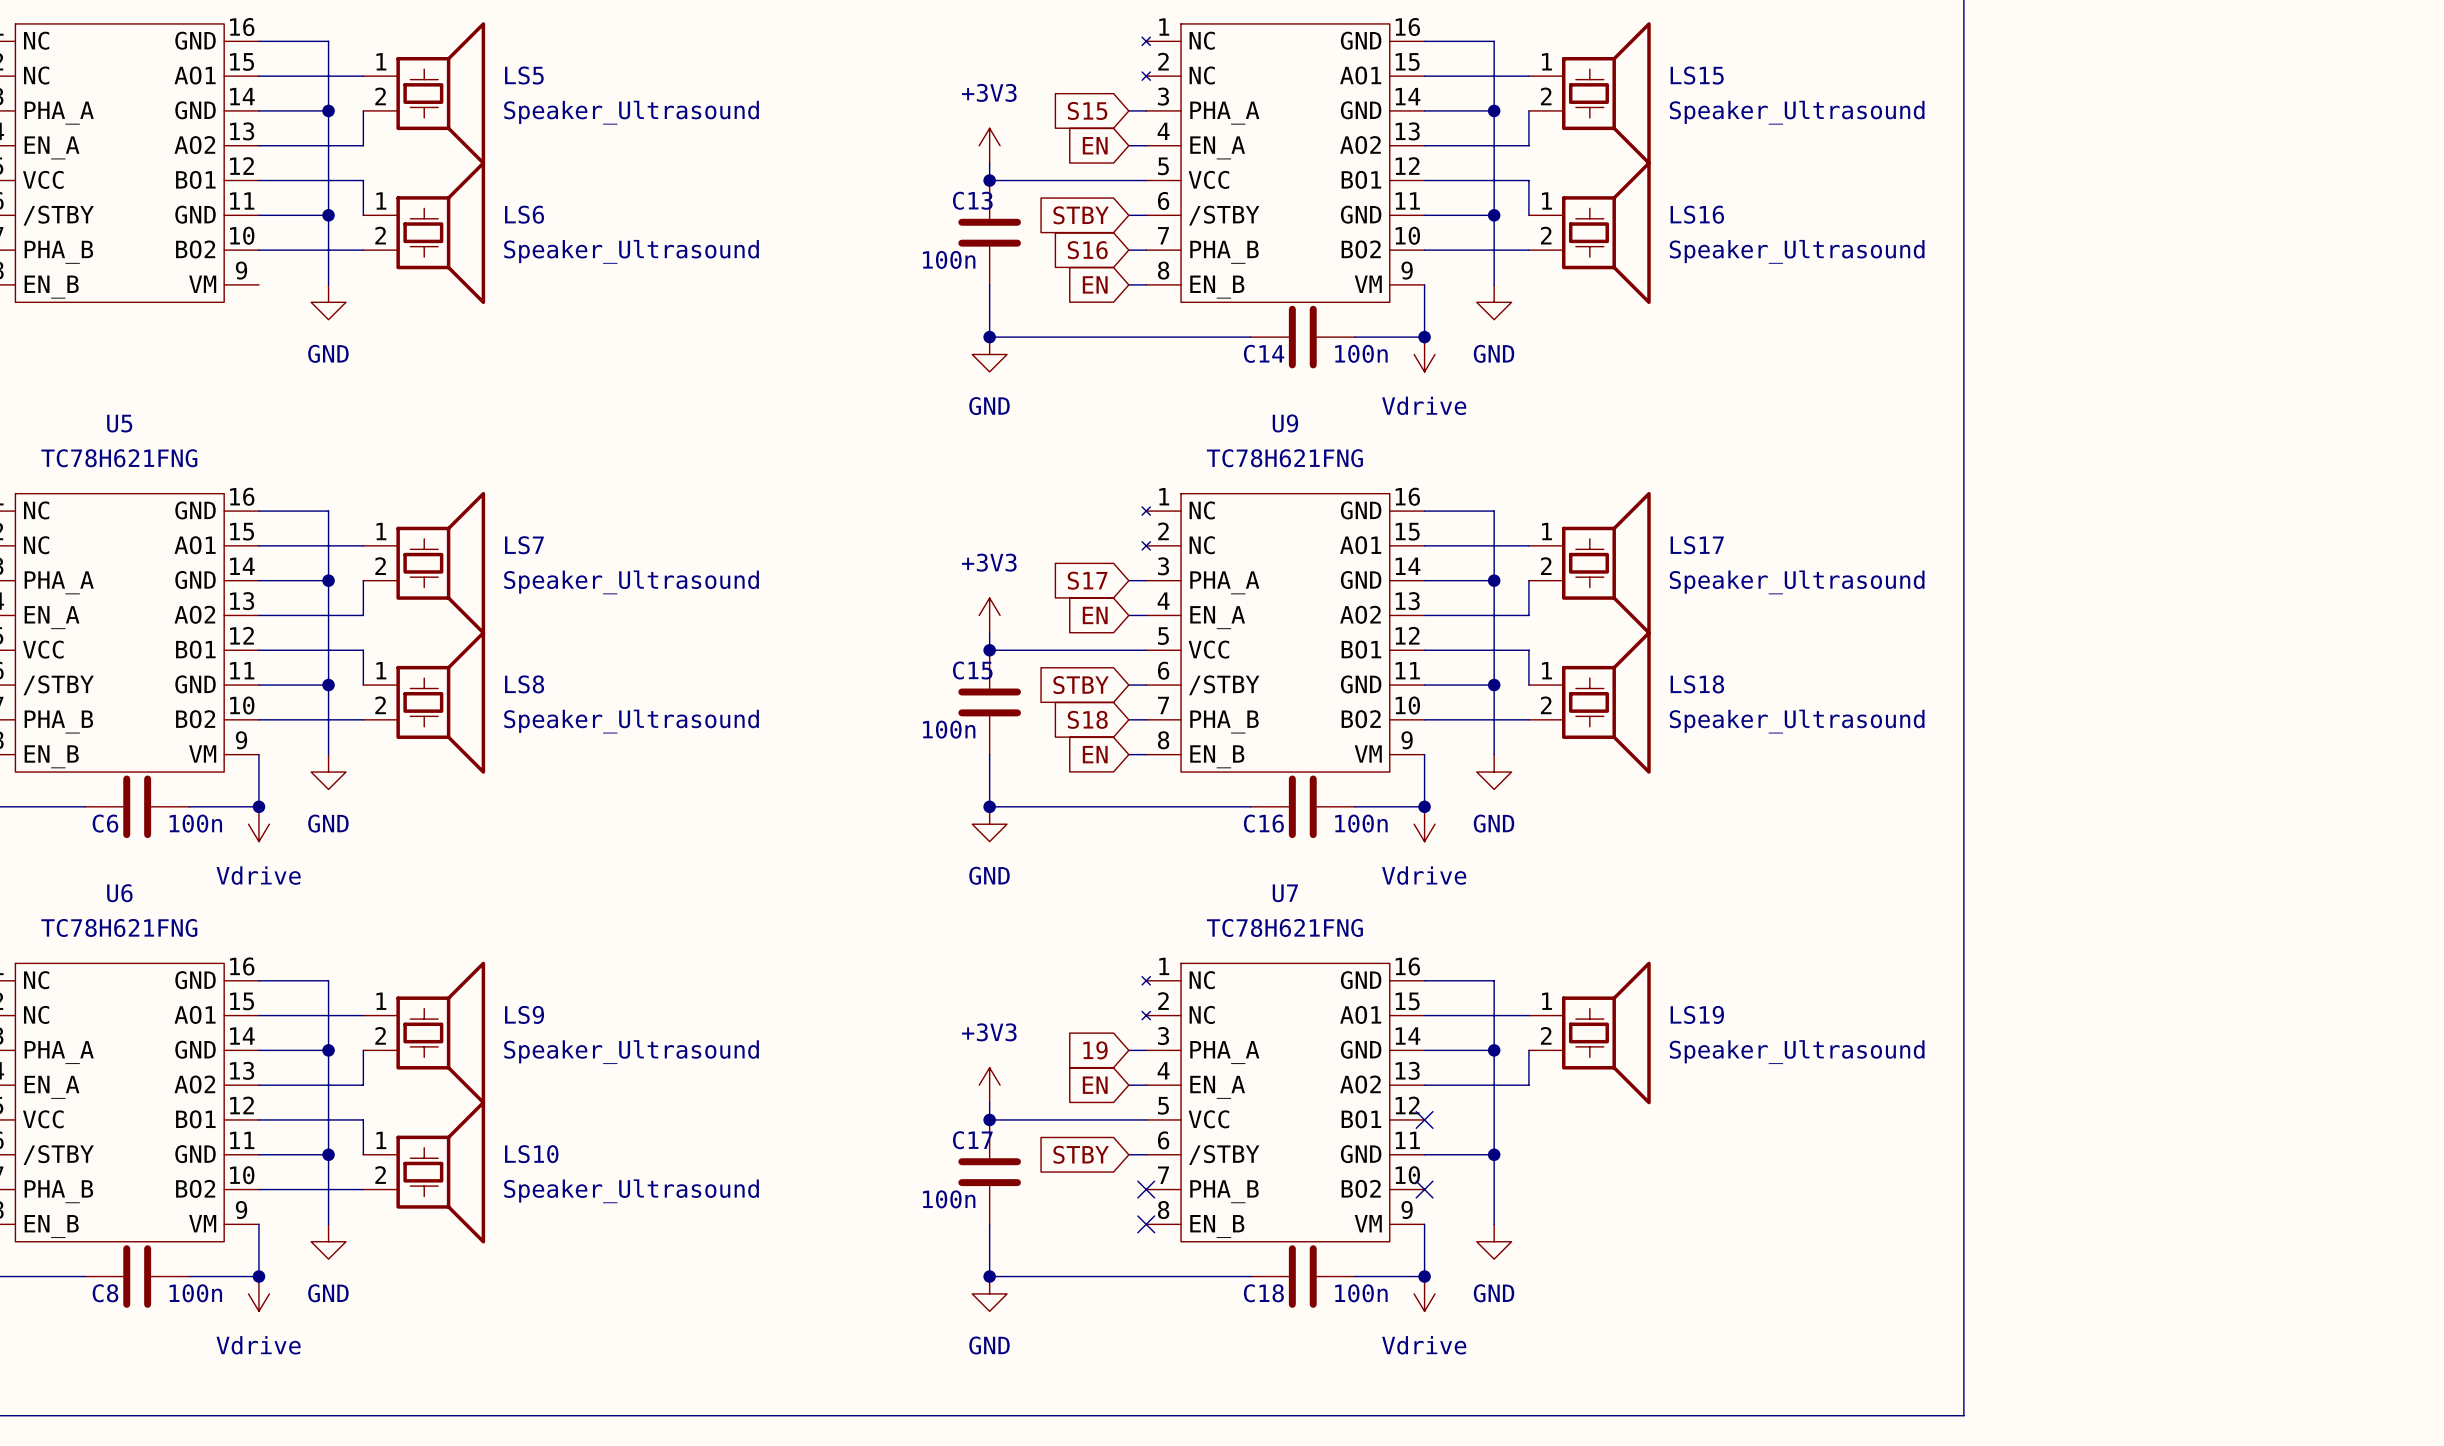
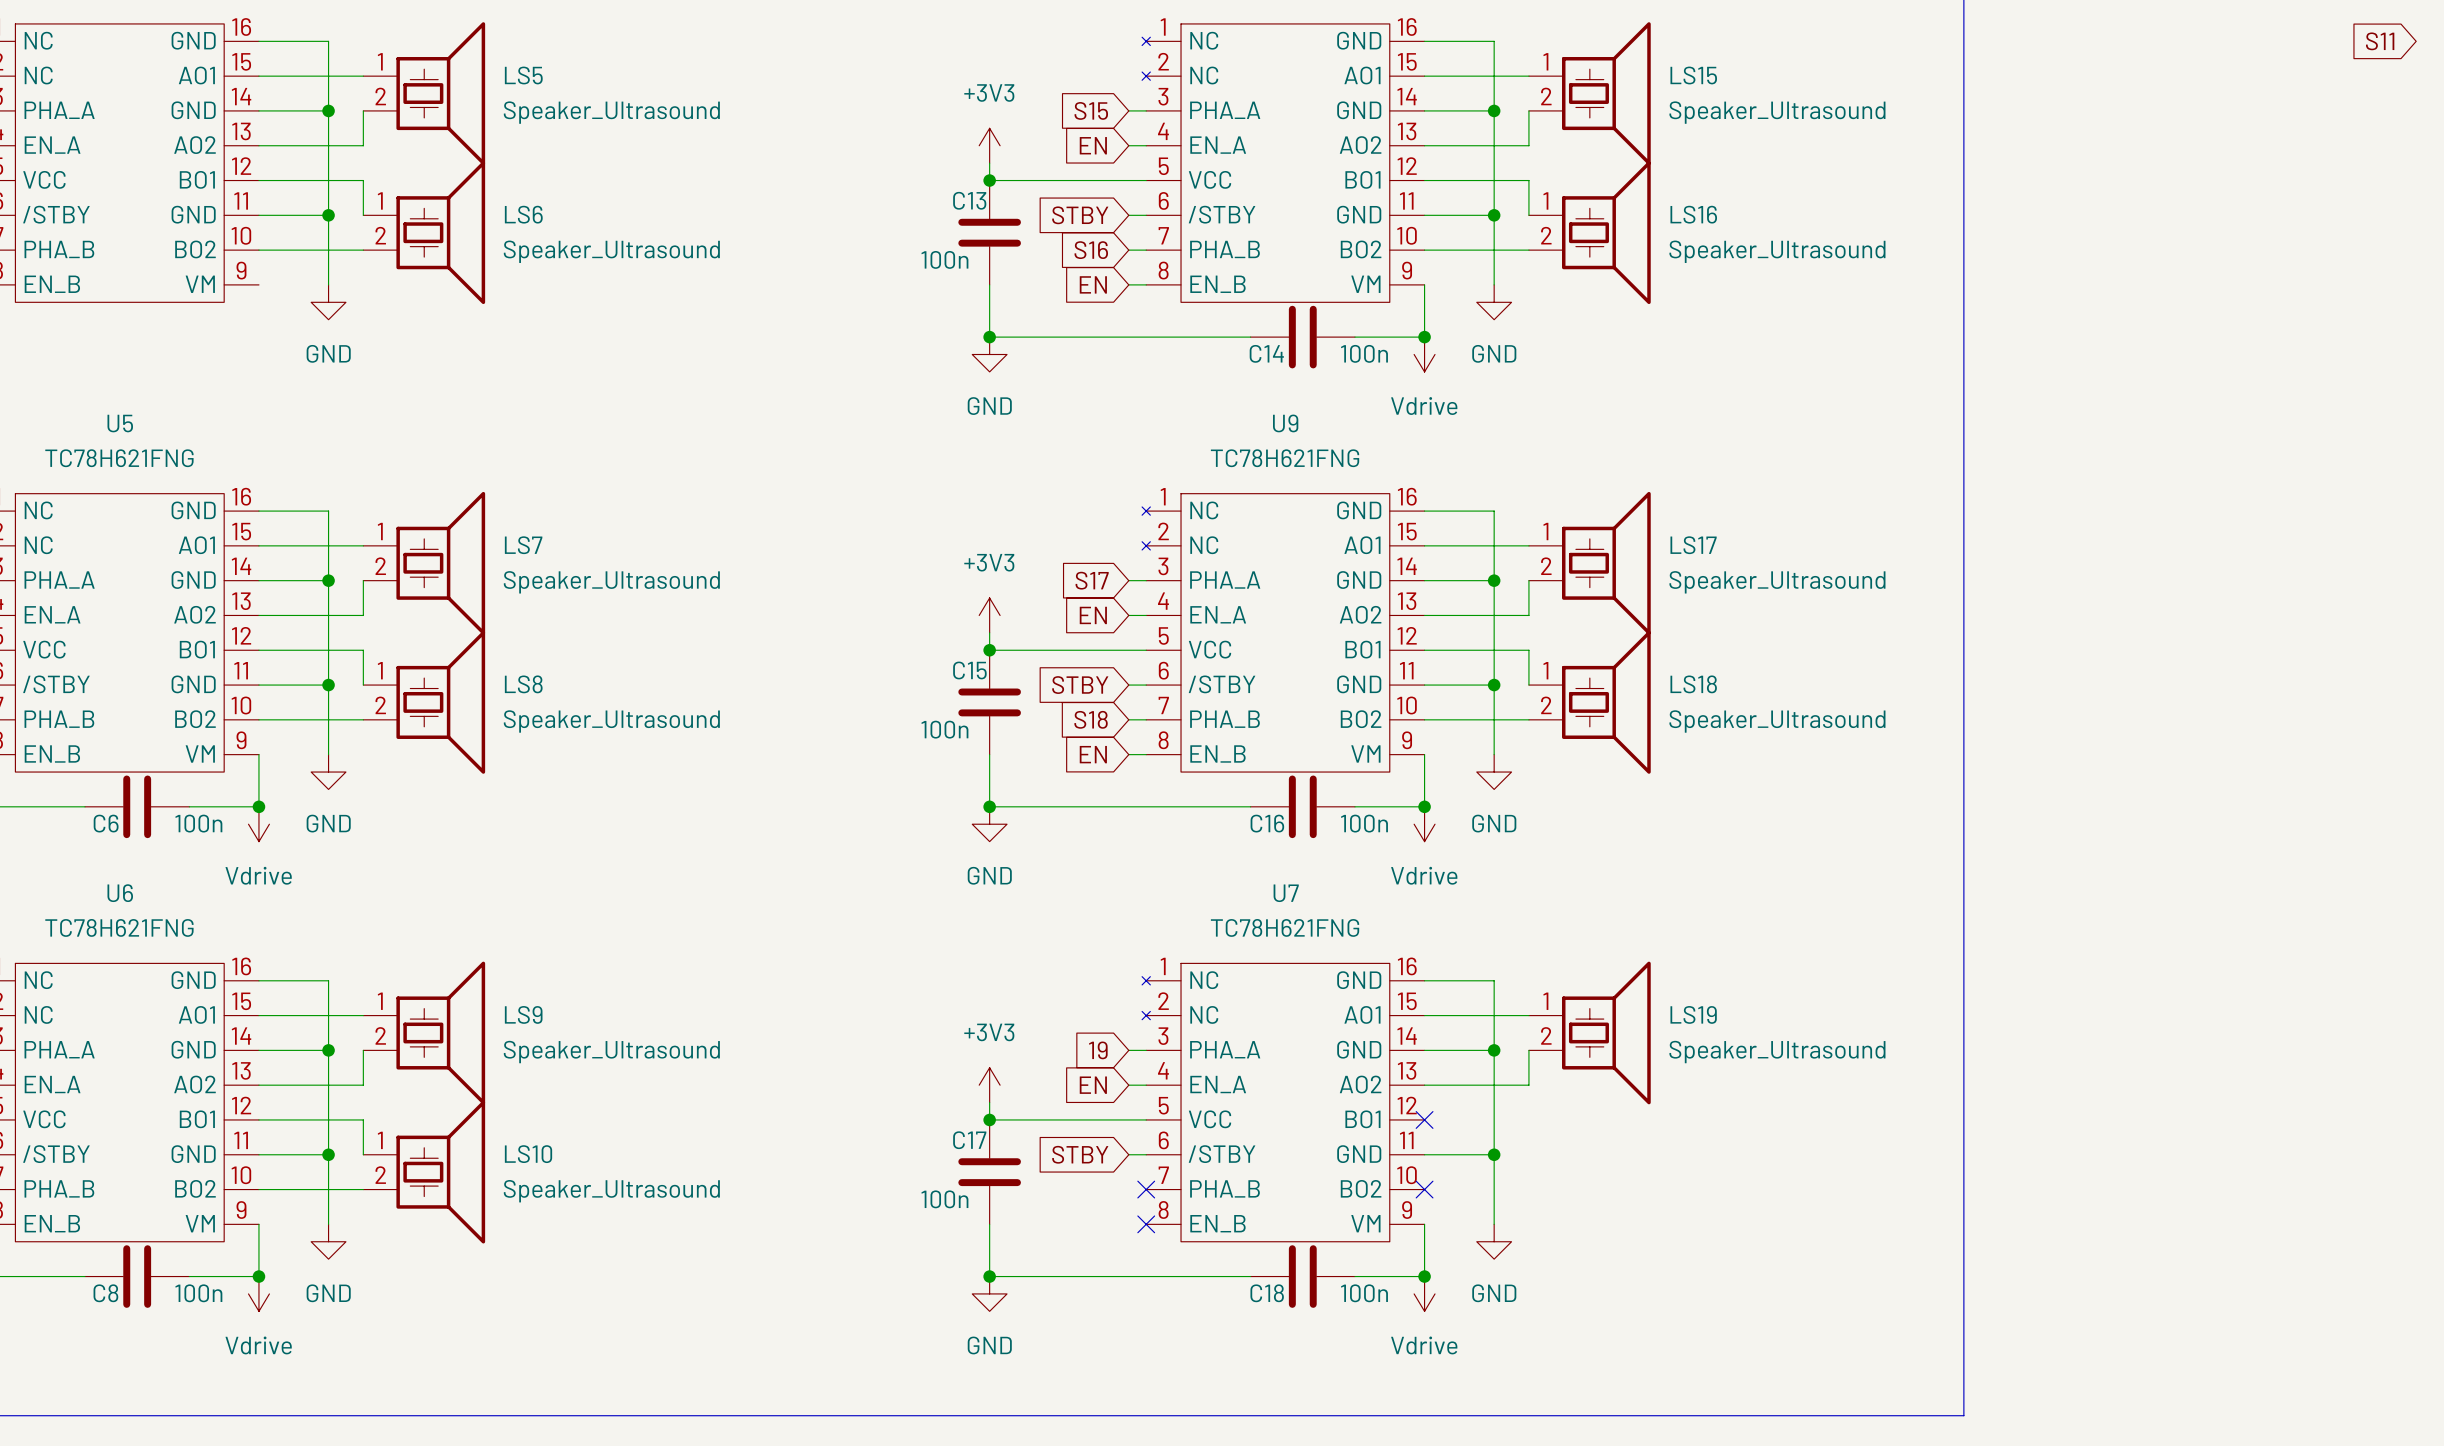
global label: none -> S11 (2380, 41)

